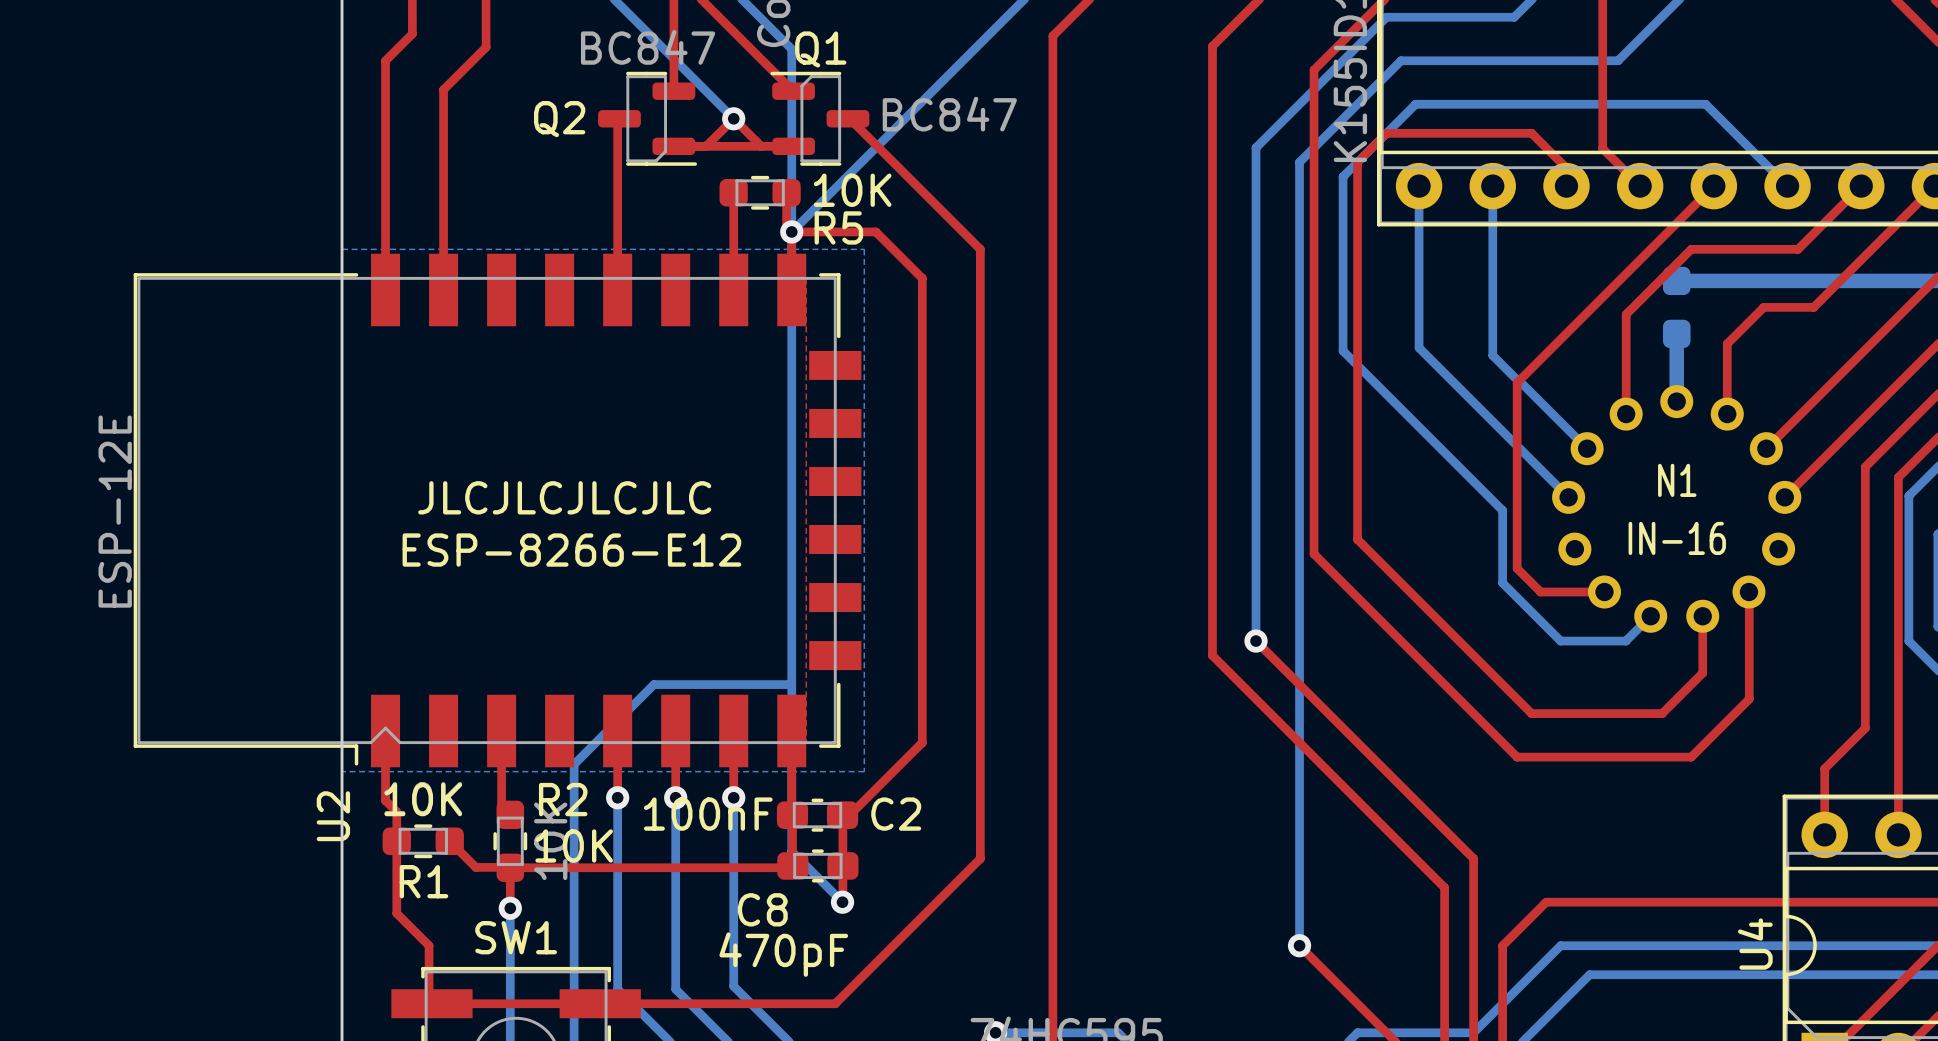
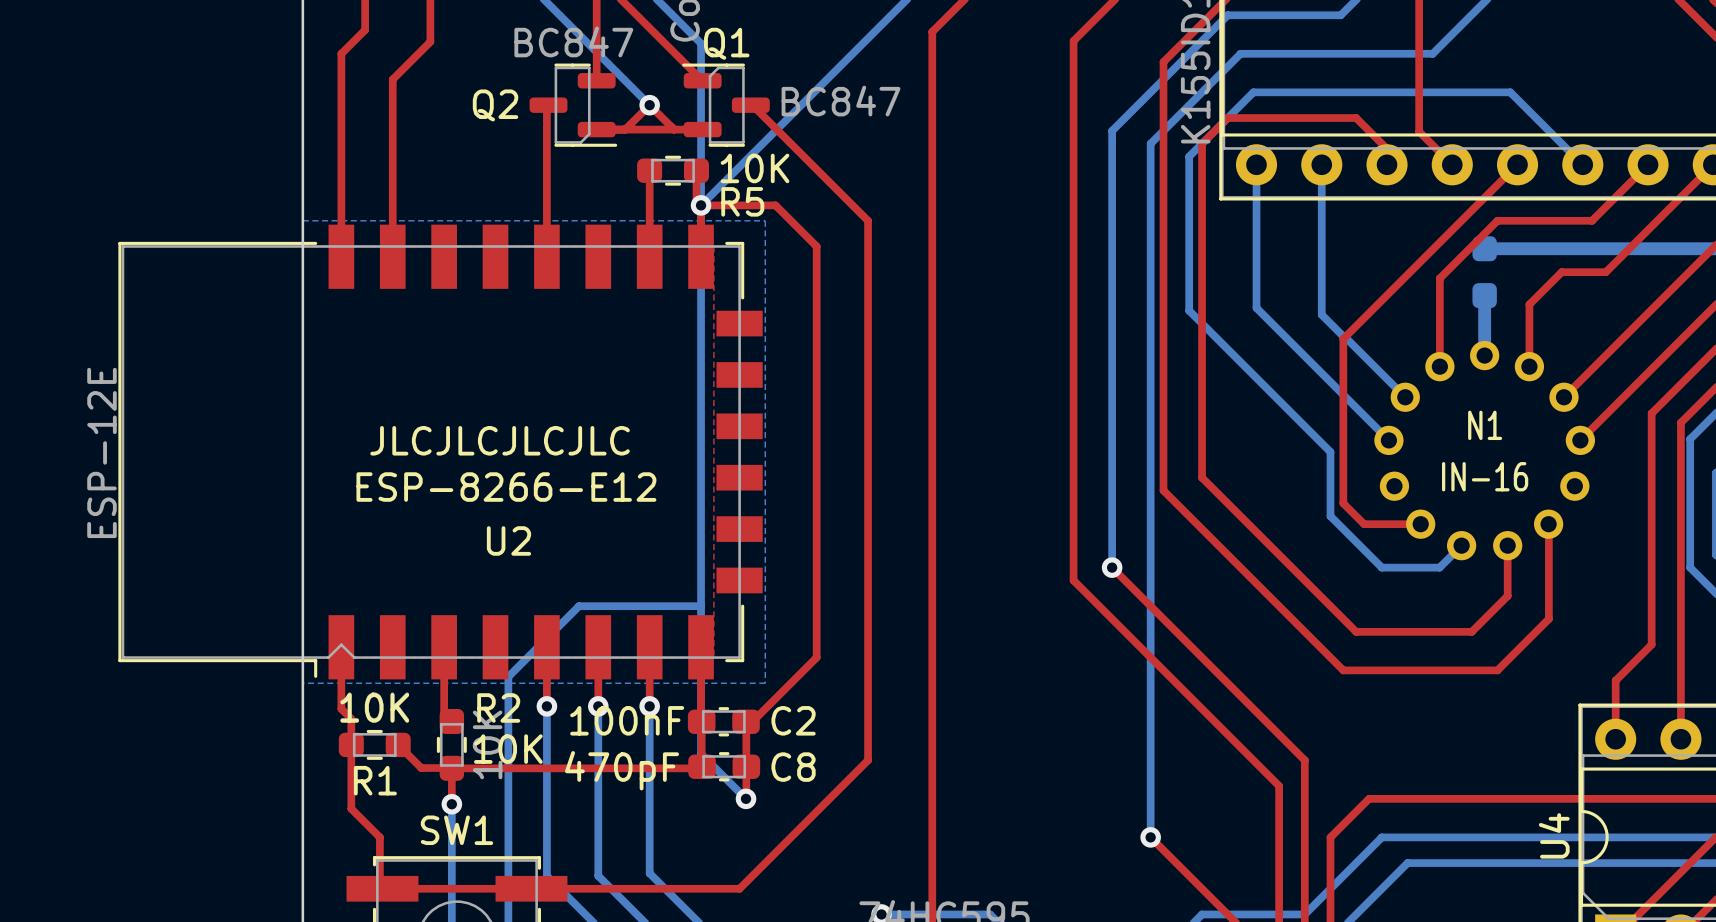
U2 name rotation: 0° (333, 816) -> 90° clockwise (508, 540)
U2 name position: U2 (333, 816) -> U2 (508, 540)
C8 name position: C8 (762, 909) -> C8 (793, 767)
C8 value position: 470pF (783, 954) -> 470pF (622, 770)

